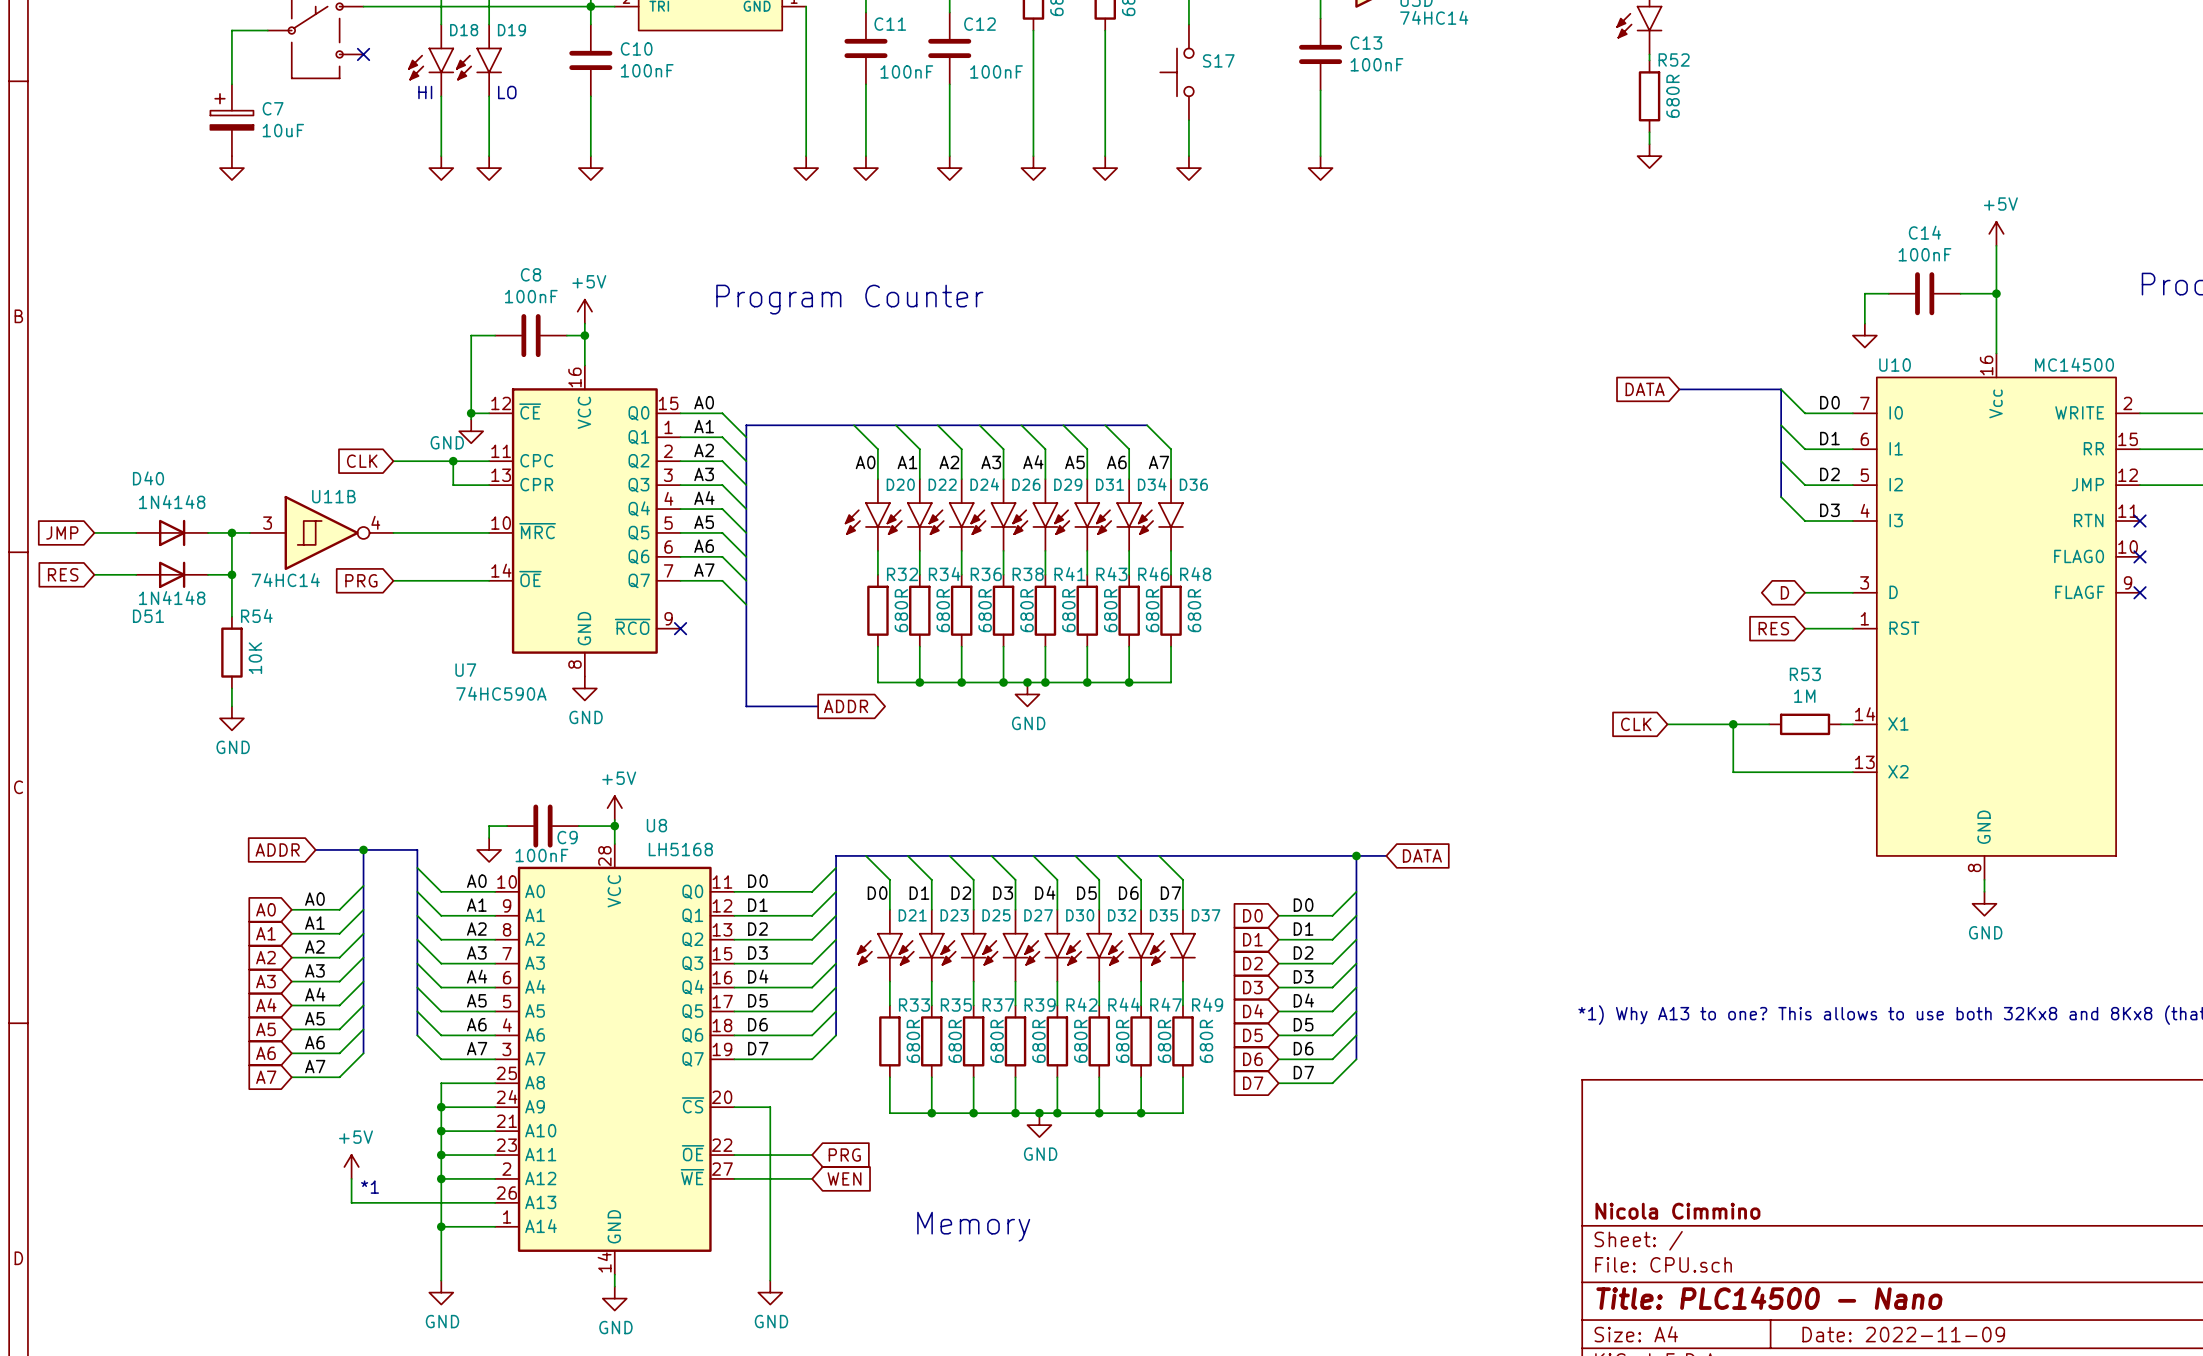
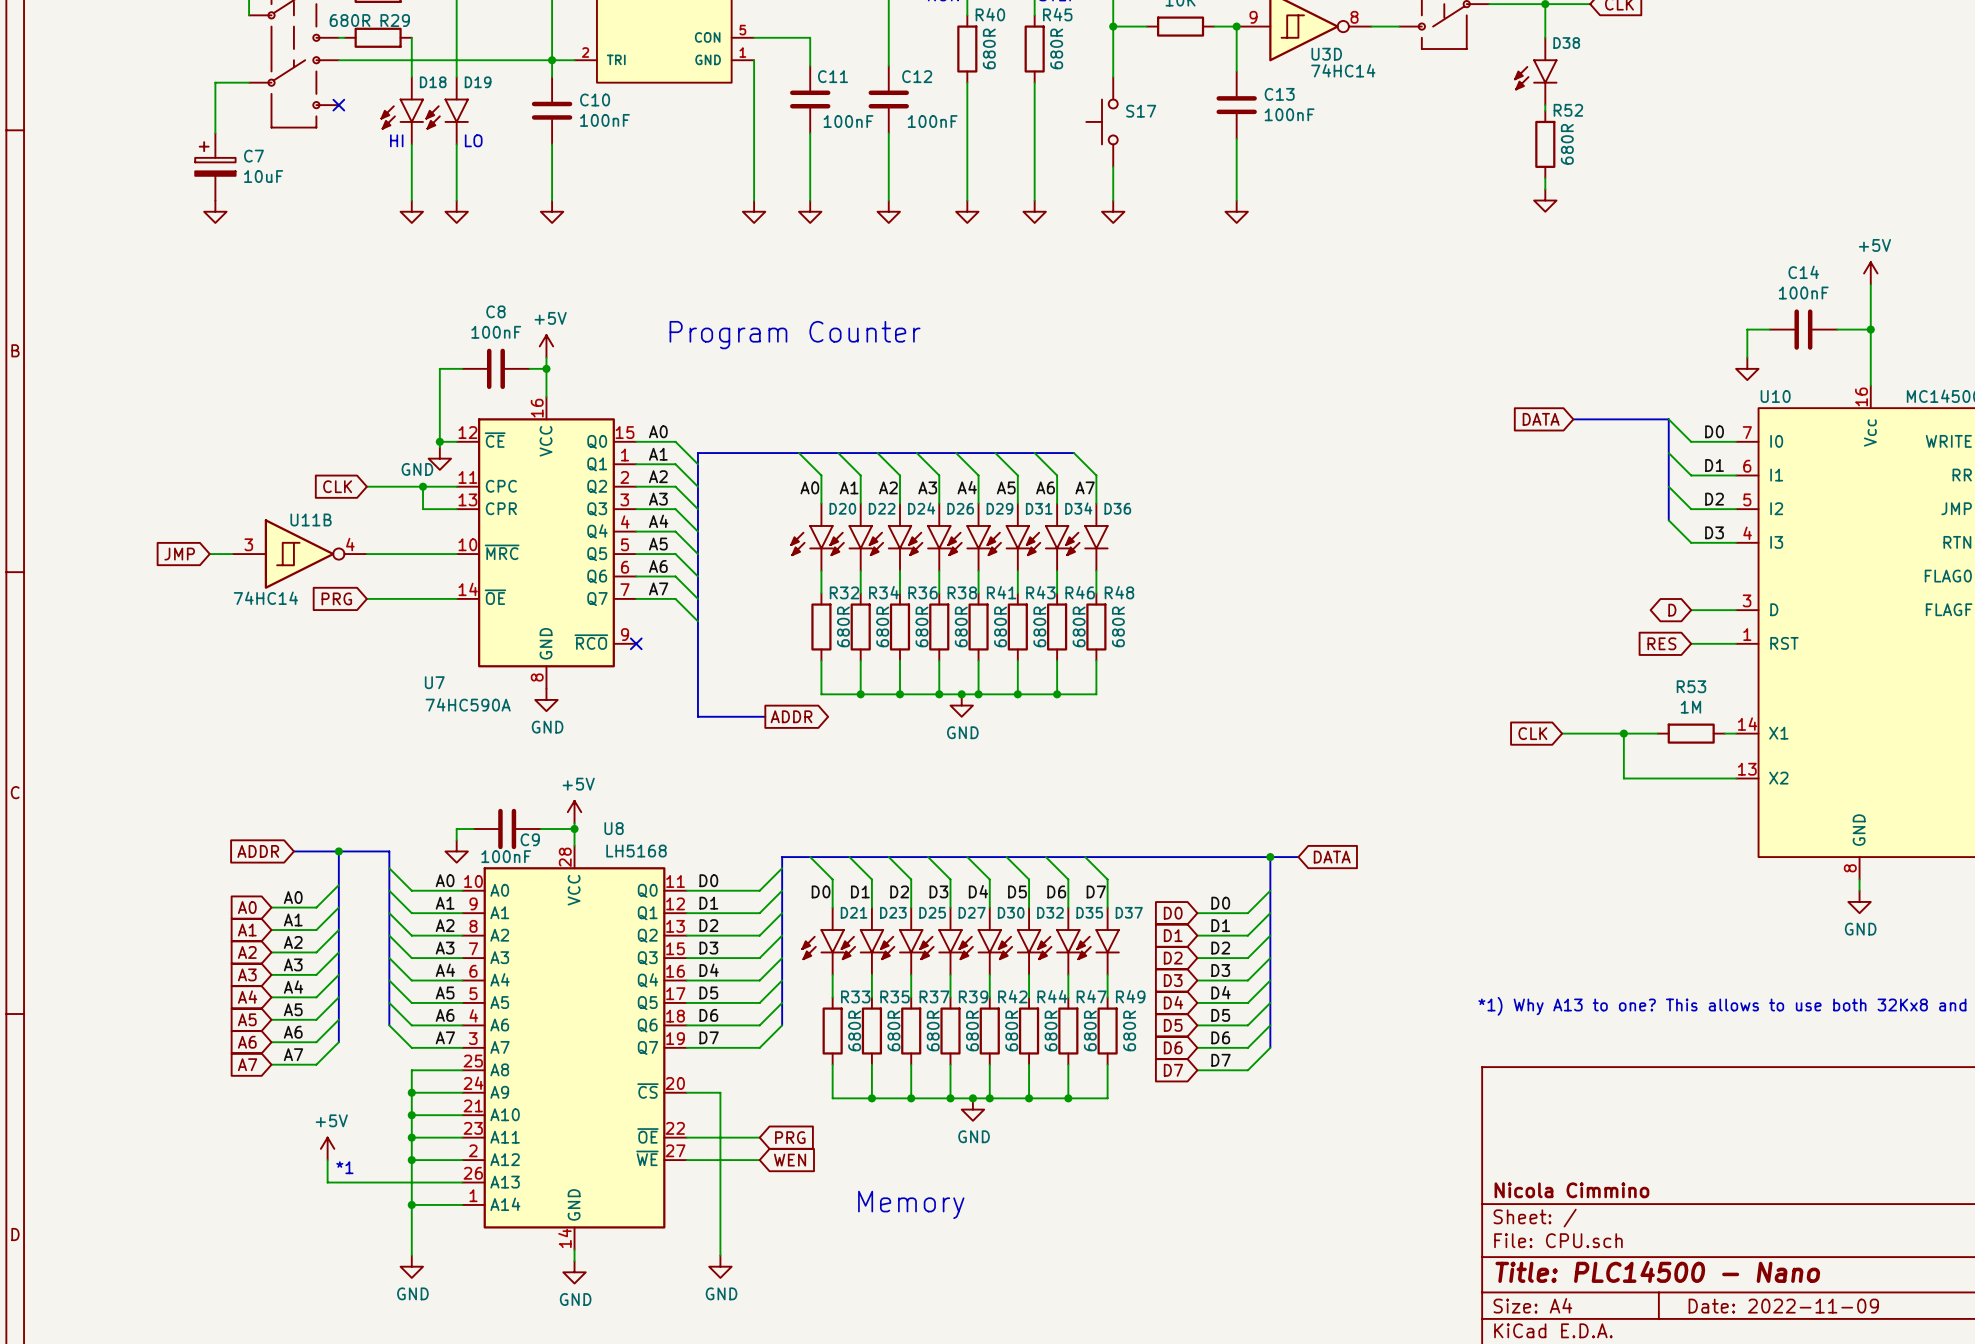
global label position: JMP (62, 532) -> JMP (179, 554)
wire: (94, 532) (136, 532) -> none
D40: 1N4148 (172, 532) -> none
wire: (208, 532) (225, 532) -> none
wire: (231, 532) (231, 616) -> none
junction: (231, 532) -> none
global label: RES (63, 574) -> none
wire: (94, 574) (136, 574) -> none
D51: 1N4148 (172, 574) -> none
wire: (208, 574) (231, 574) -> none
junction: (231, 574) -> none
R54: 10K (231, 652) -> none
wire: (231, 688) (231, 706) -> none
power symbol: GND (231, 718) -> none

